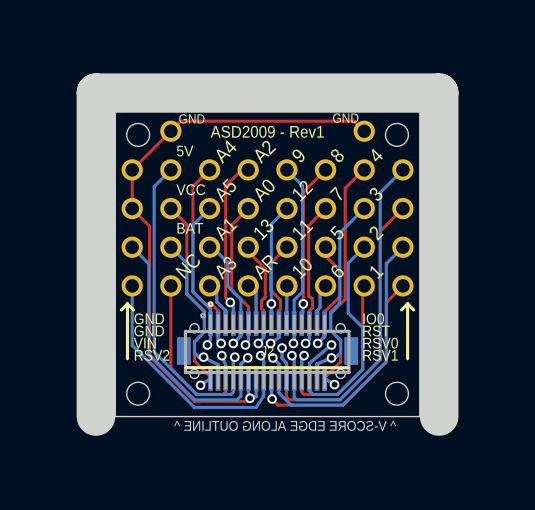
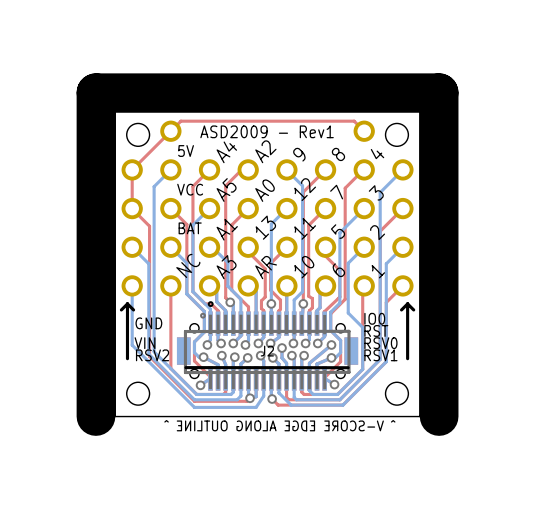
text: GND (191, 118) -> none
text: GND (345, 118) -> none
text: GND (149, 318) -> none
text: none -> GND (148, 323)
text: GND (149, 330) -> none

